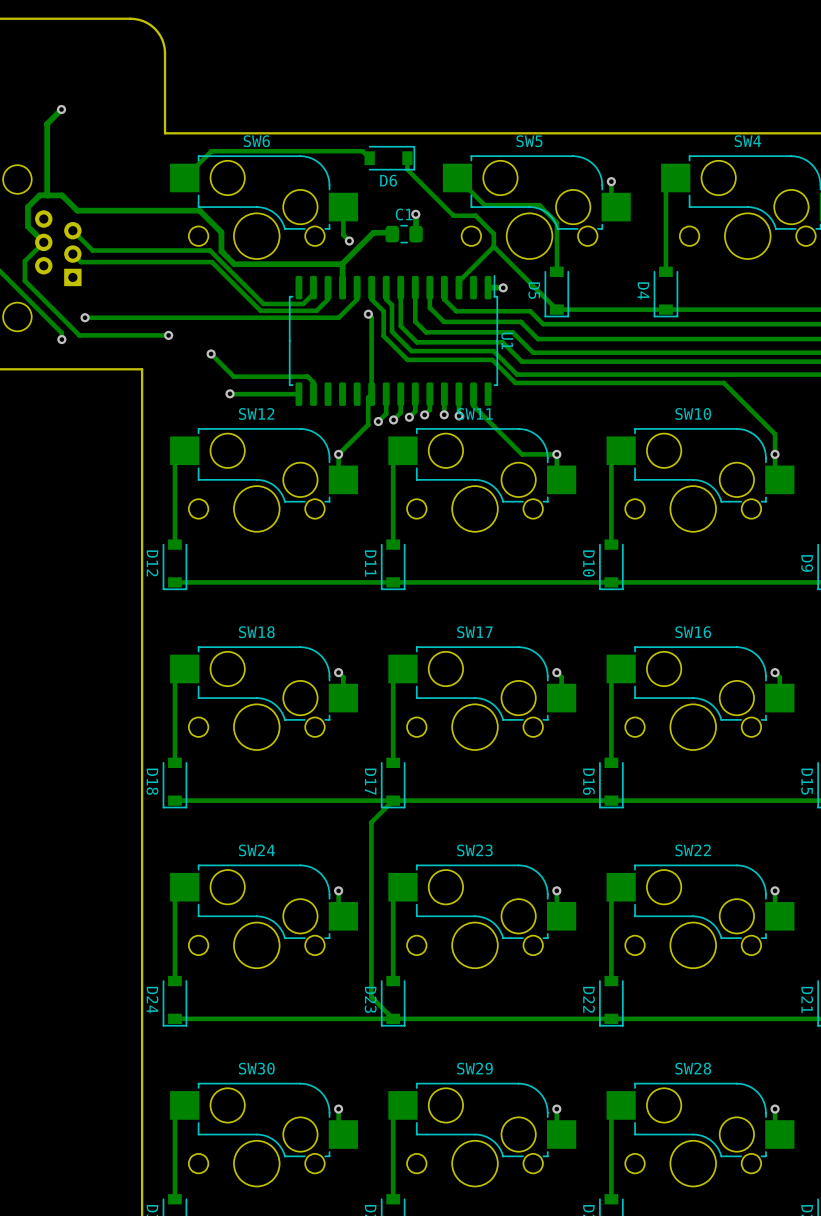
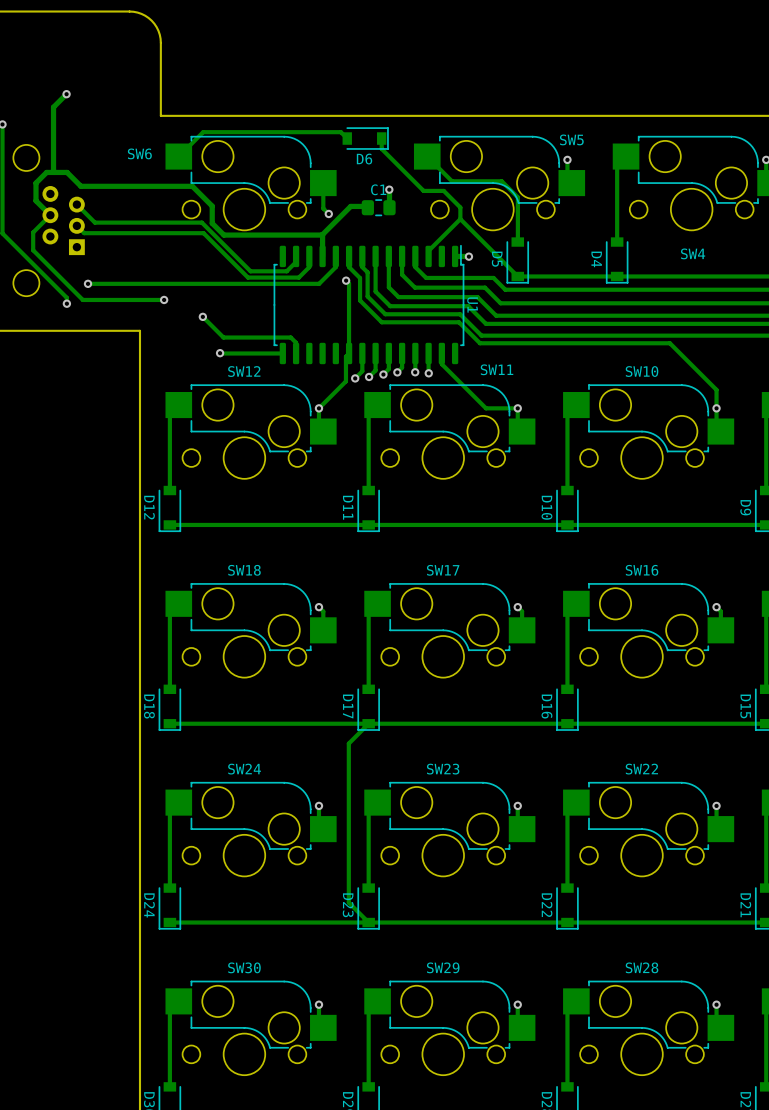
SW6 name position: SW6 (256, 141) -> SW6 (139, 153)
SW5 name position: SW5 (529, 141) -> SW5 (571, 139)
SW4 name position: SW4 (747, 141) -> SW4 (693, 253)
SW11 name position: SW11 (474, 413) -> SW11 (497, 369)

